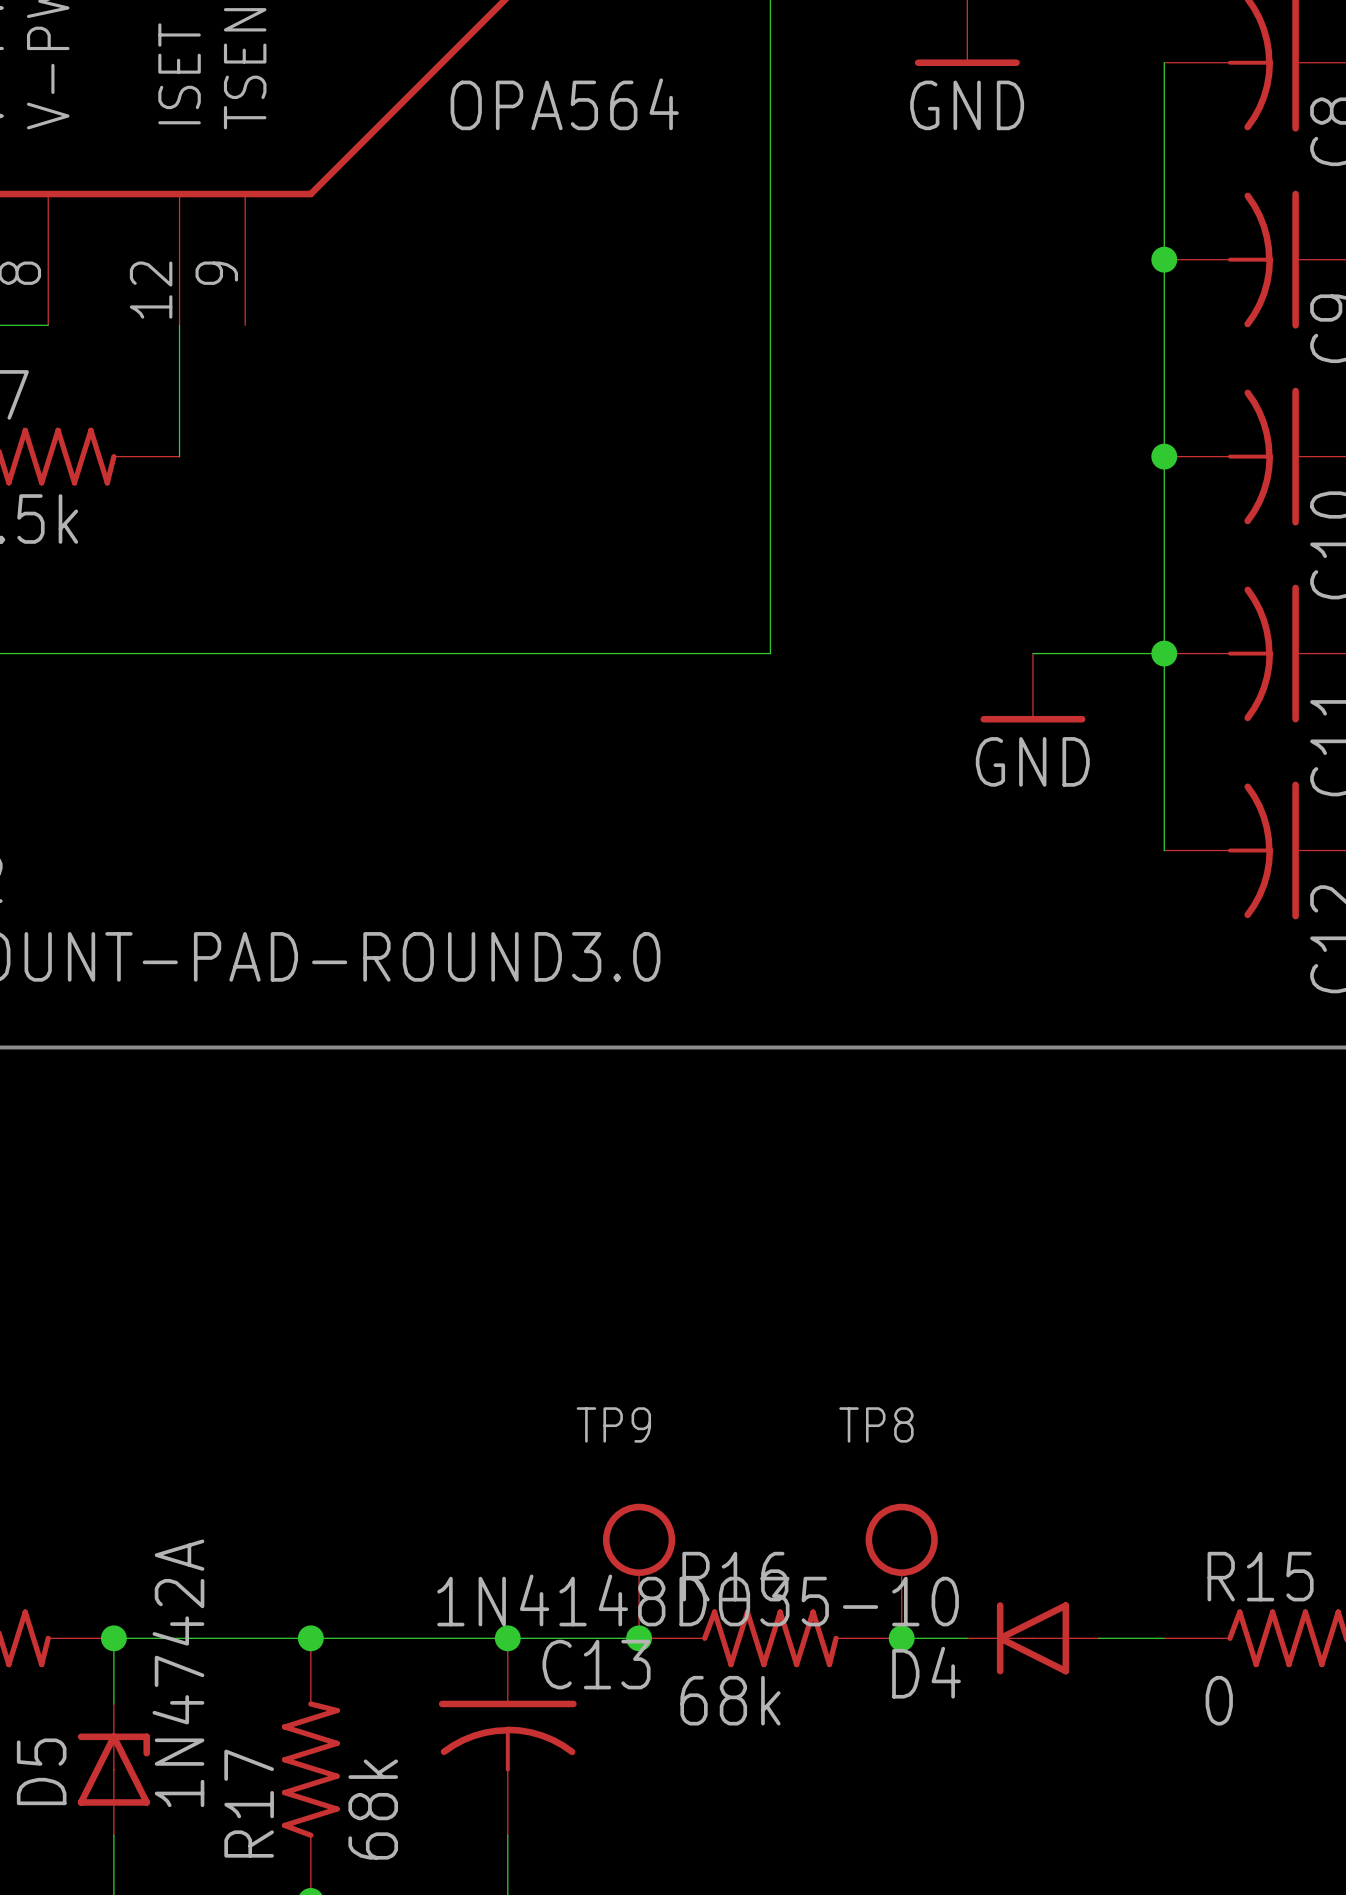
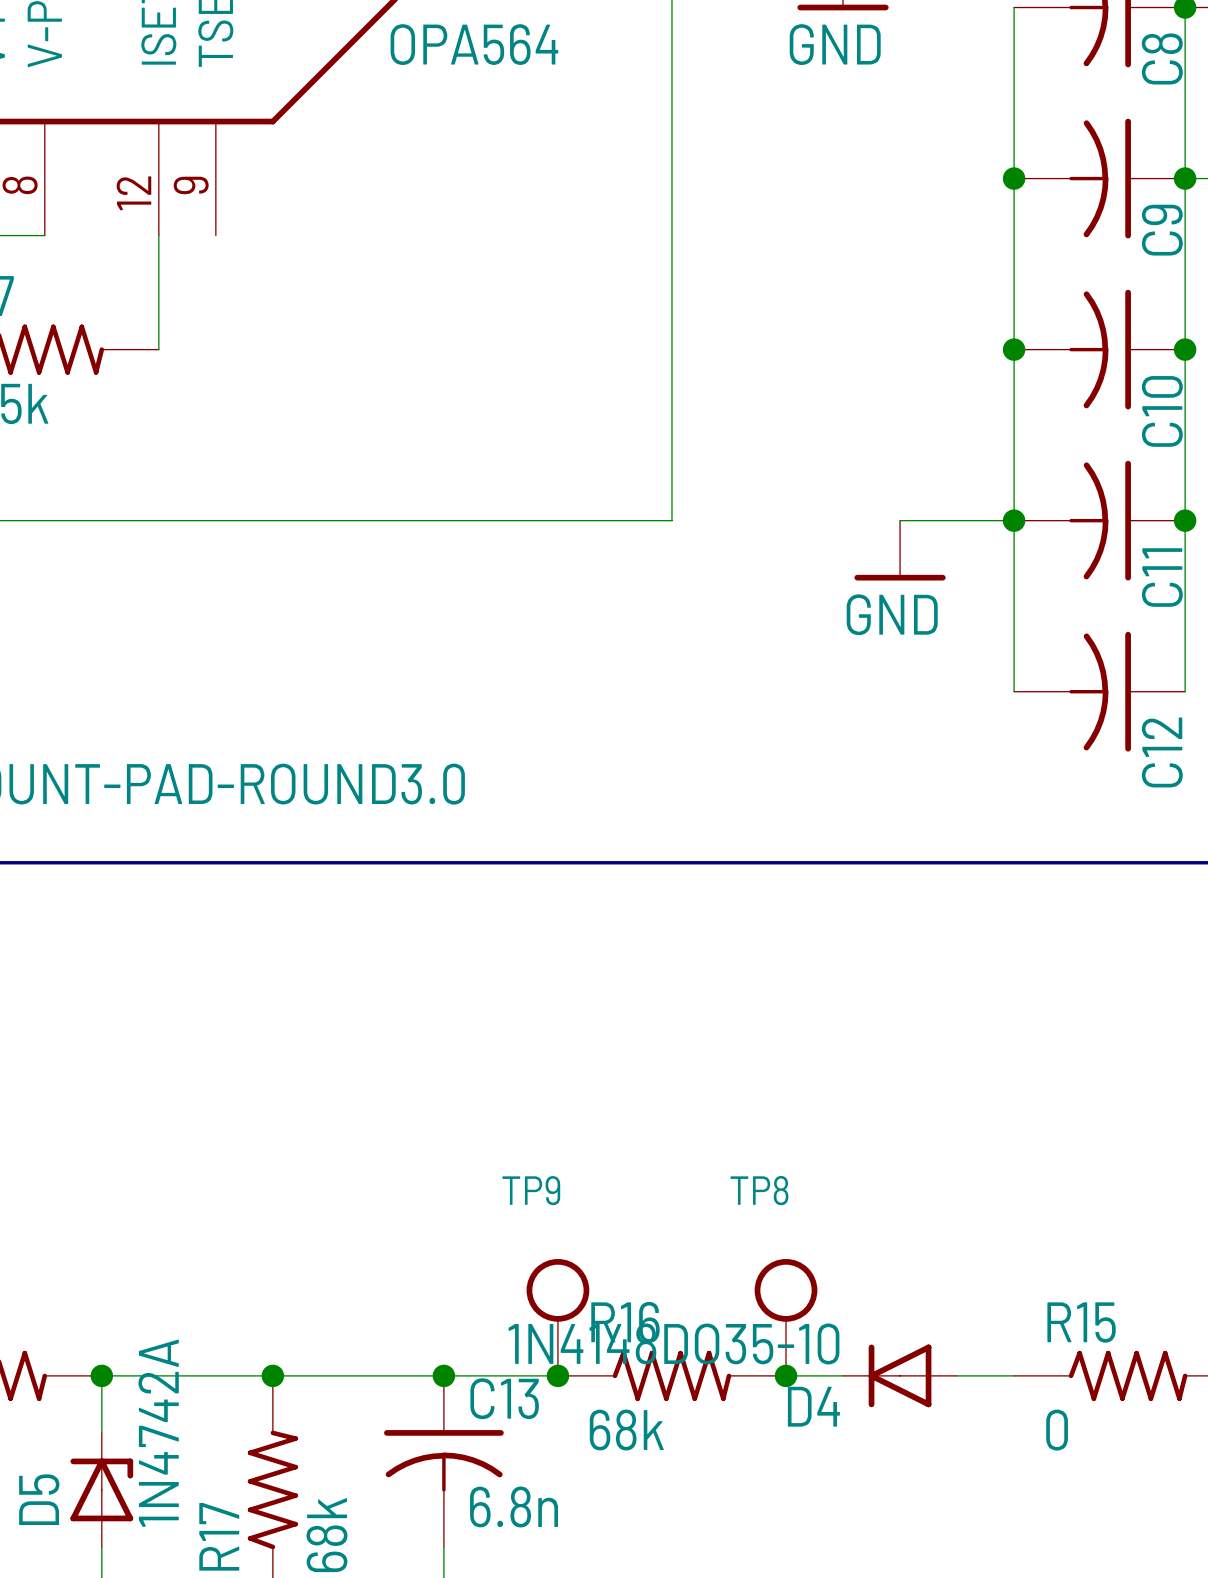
C13 value: none -> 6.8n (514, 1506)

